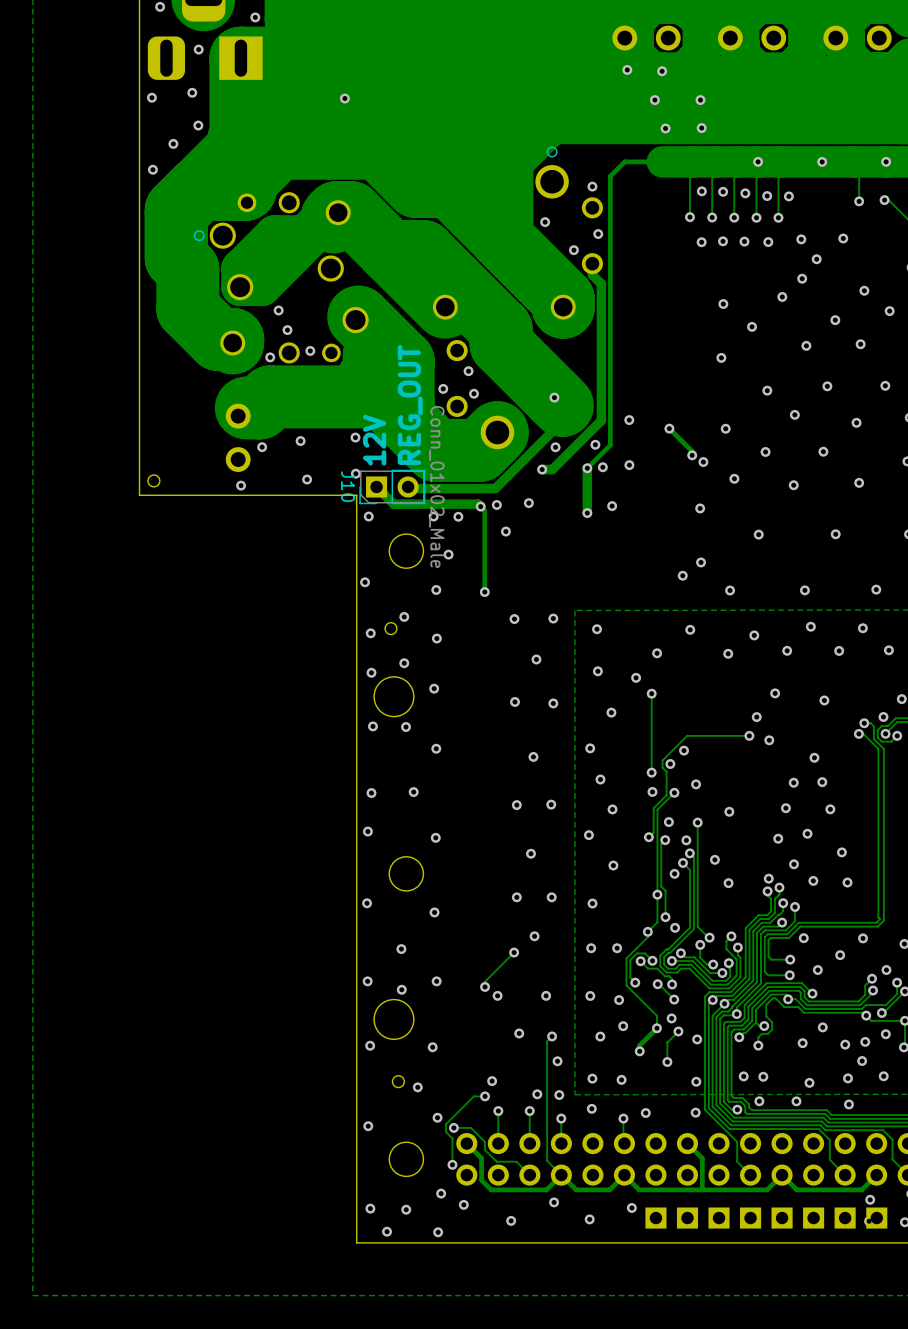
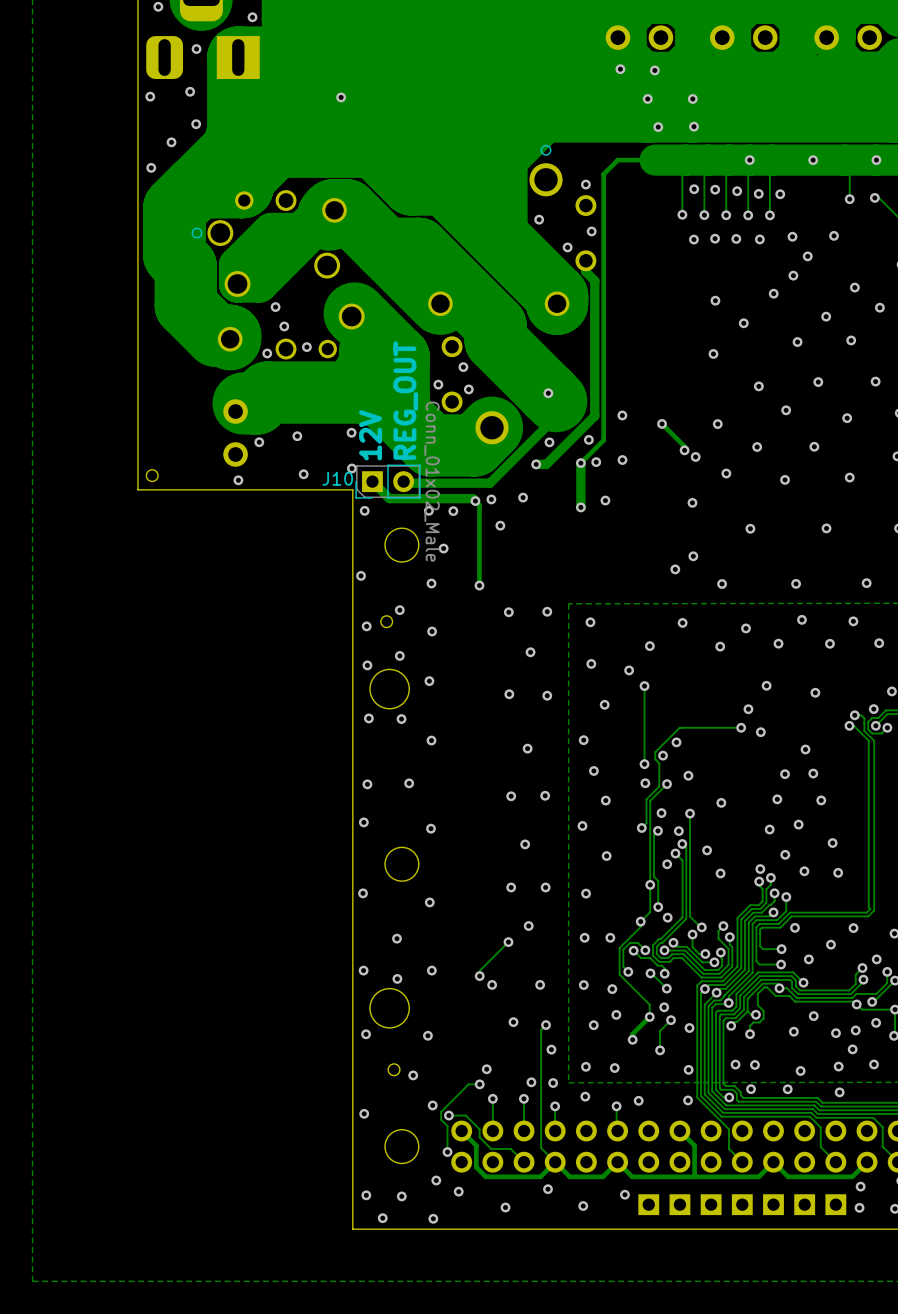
J10 name rotation: 0° (348, 486) -> 90° counterclockwise (337, 478)
part: (876, 1218) -> none

